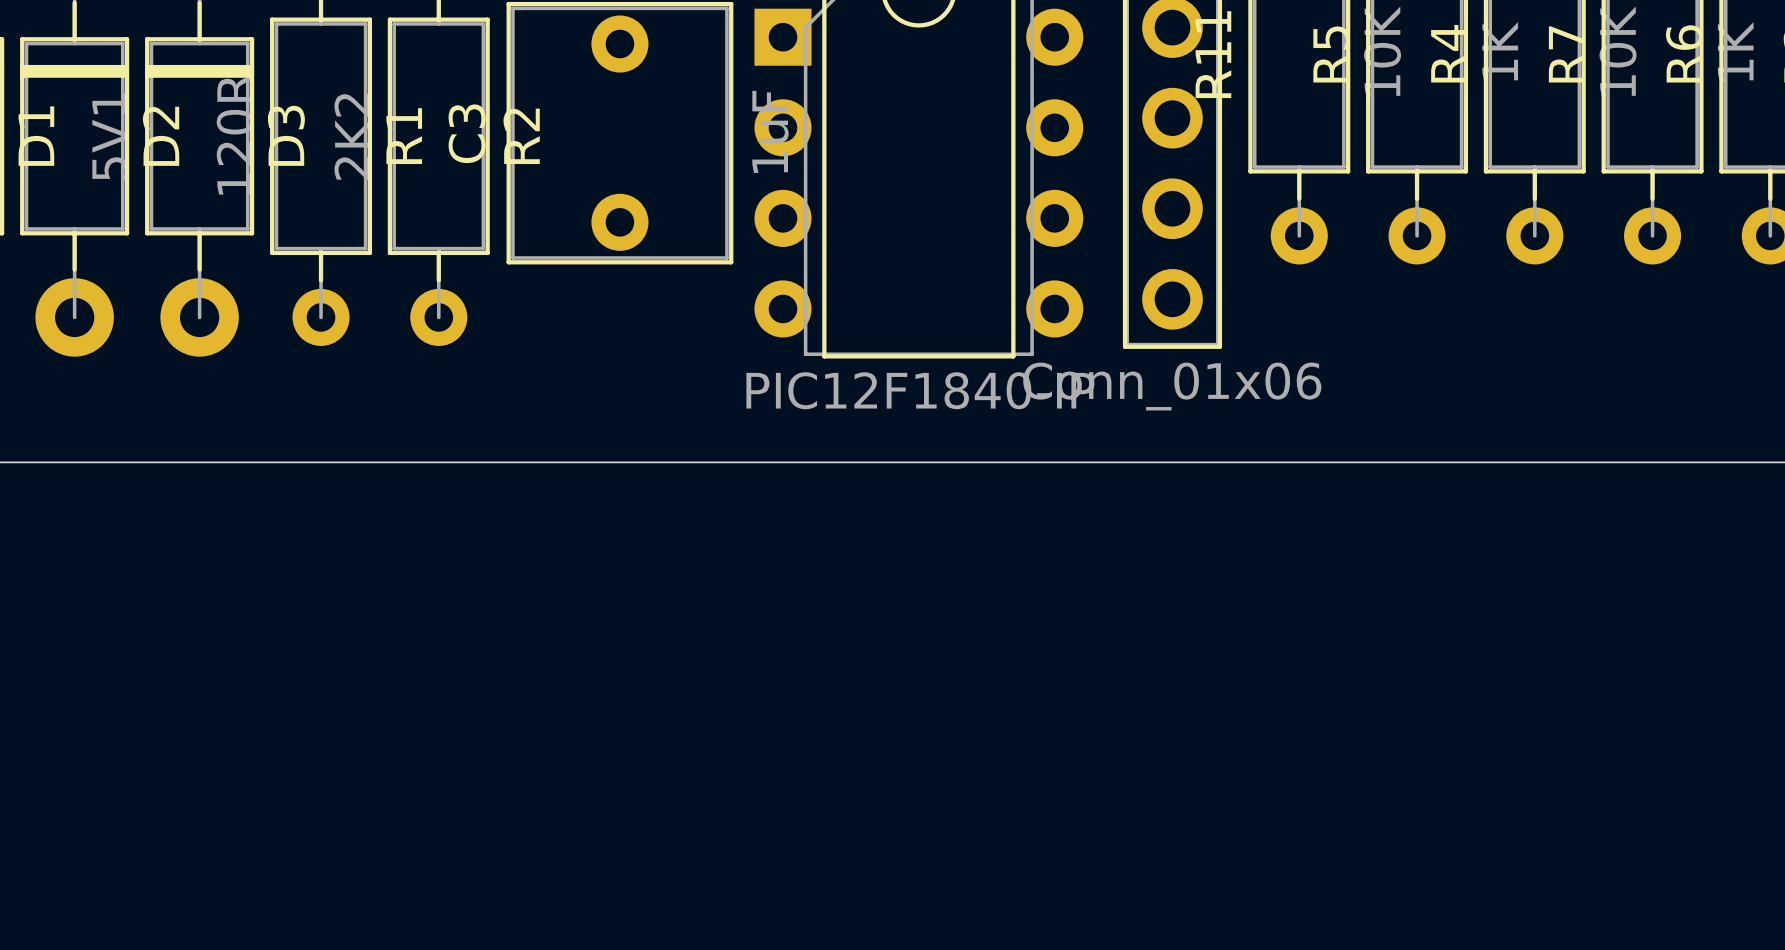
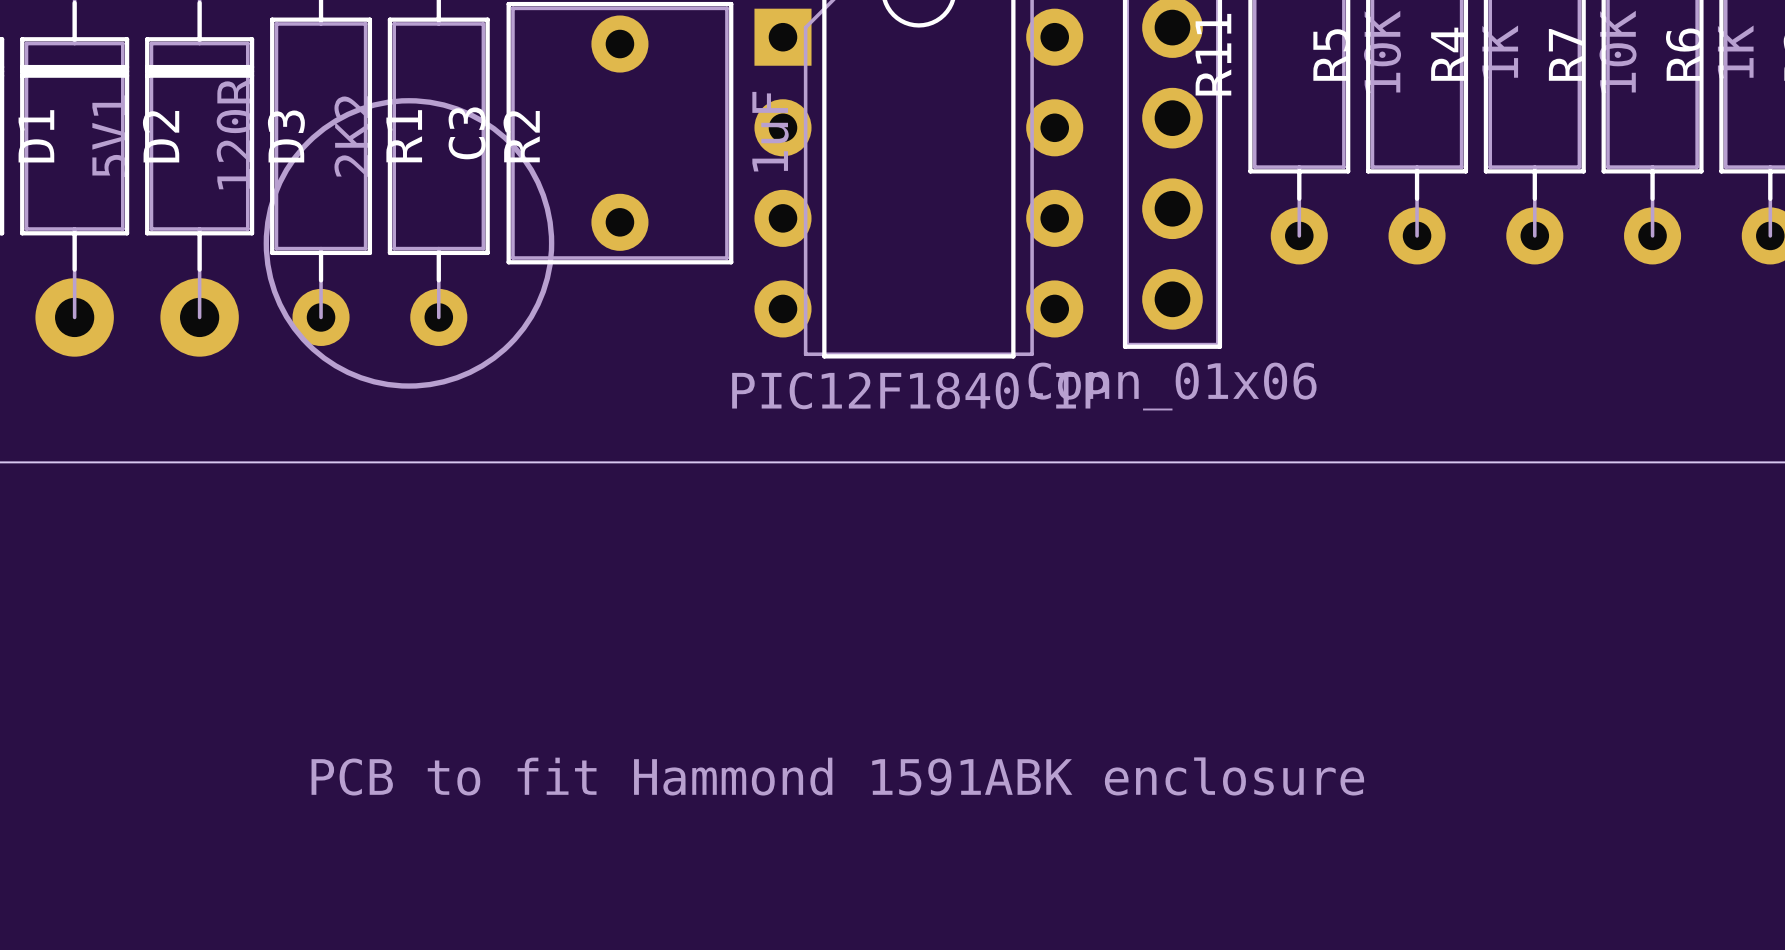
drawing: none -> [263, 98, 555, 389]
text: none -> PCB to fit Hammond 1591ABK enclosure (837, 776)

